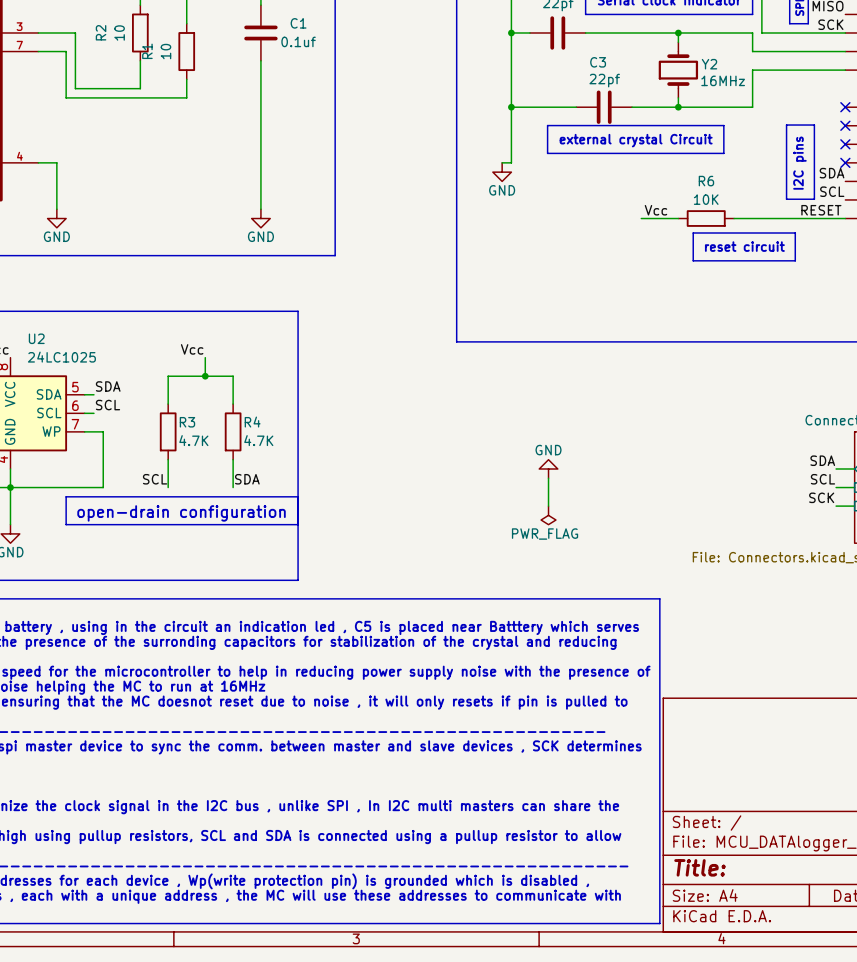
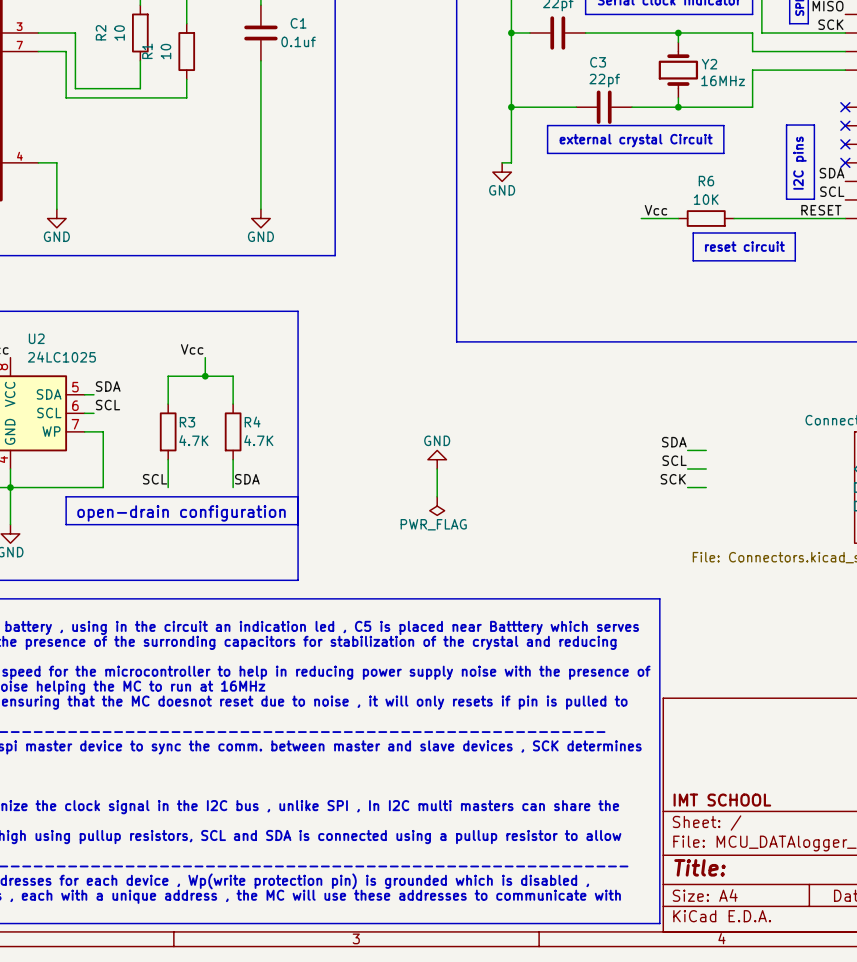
label position: SDA (822, 460) -> SDA (674, 442)
power symbol position: GND (548, 468) -> GND (437, 459)
wire: (836, 468) (854, 468) -> (687, 450) (706, 450)
wire: (548, 478) (548, 506) -> (437, 468) (437, 496)
label position: SCL (822, 479) -> SCL (674, 460)
wire: (836, 487) (854, 487) -> (687, 468) (706, 468)
label position: SCK (821, 497) -> SCK (673, 479)
wire: (836, 506) (854, 506) -> (687, 487) (706, 487)
power symbol position: PWR_FLAG (548, 515) -> PWR_FLAG (437, 506)
title block: none -> IMT SCHOOL (722, 800)

